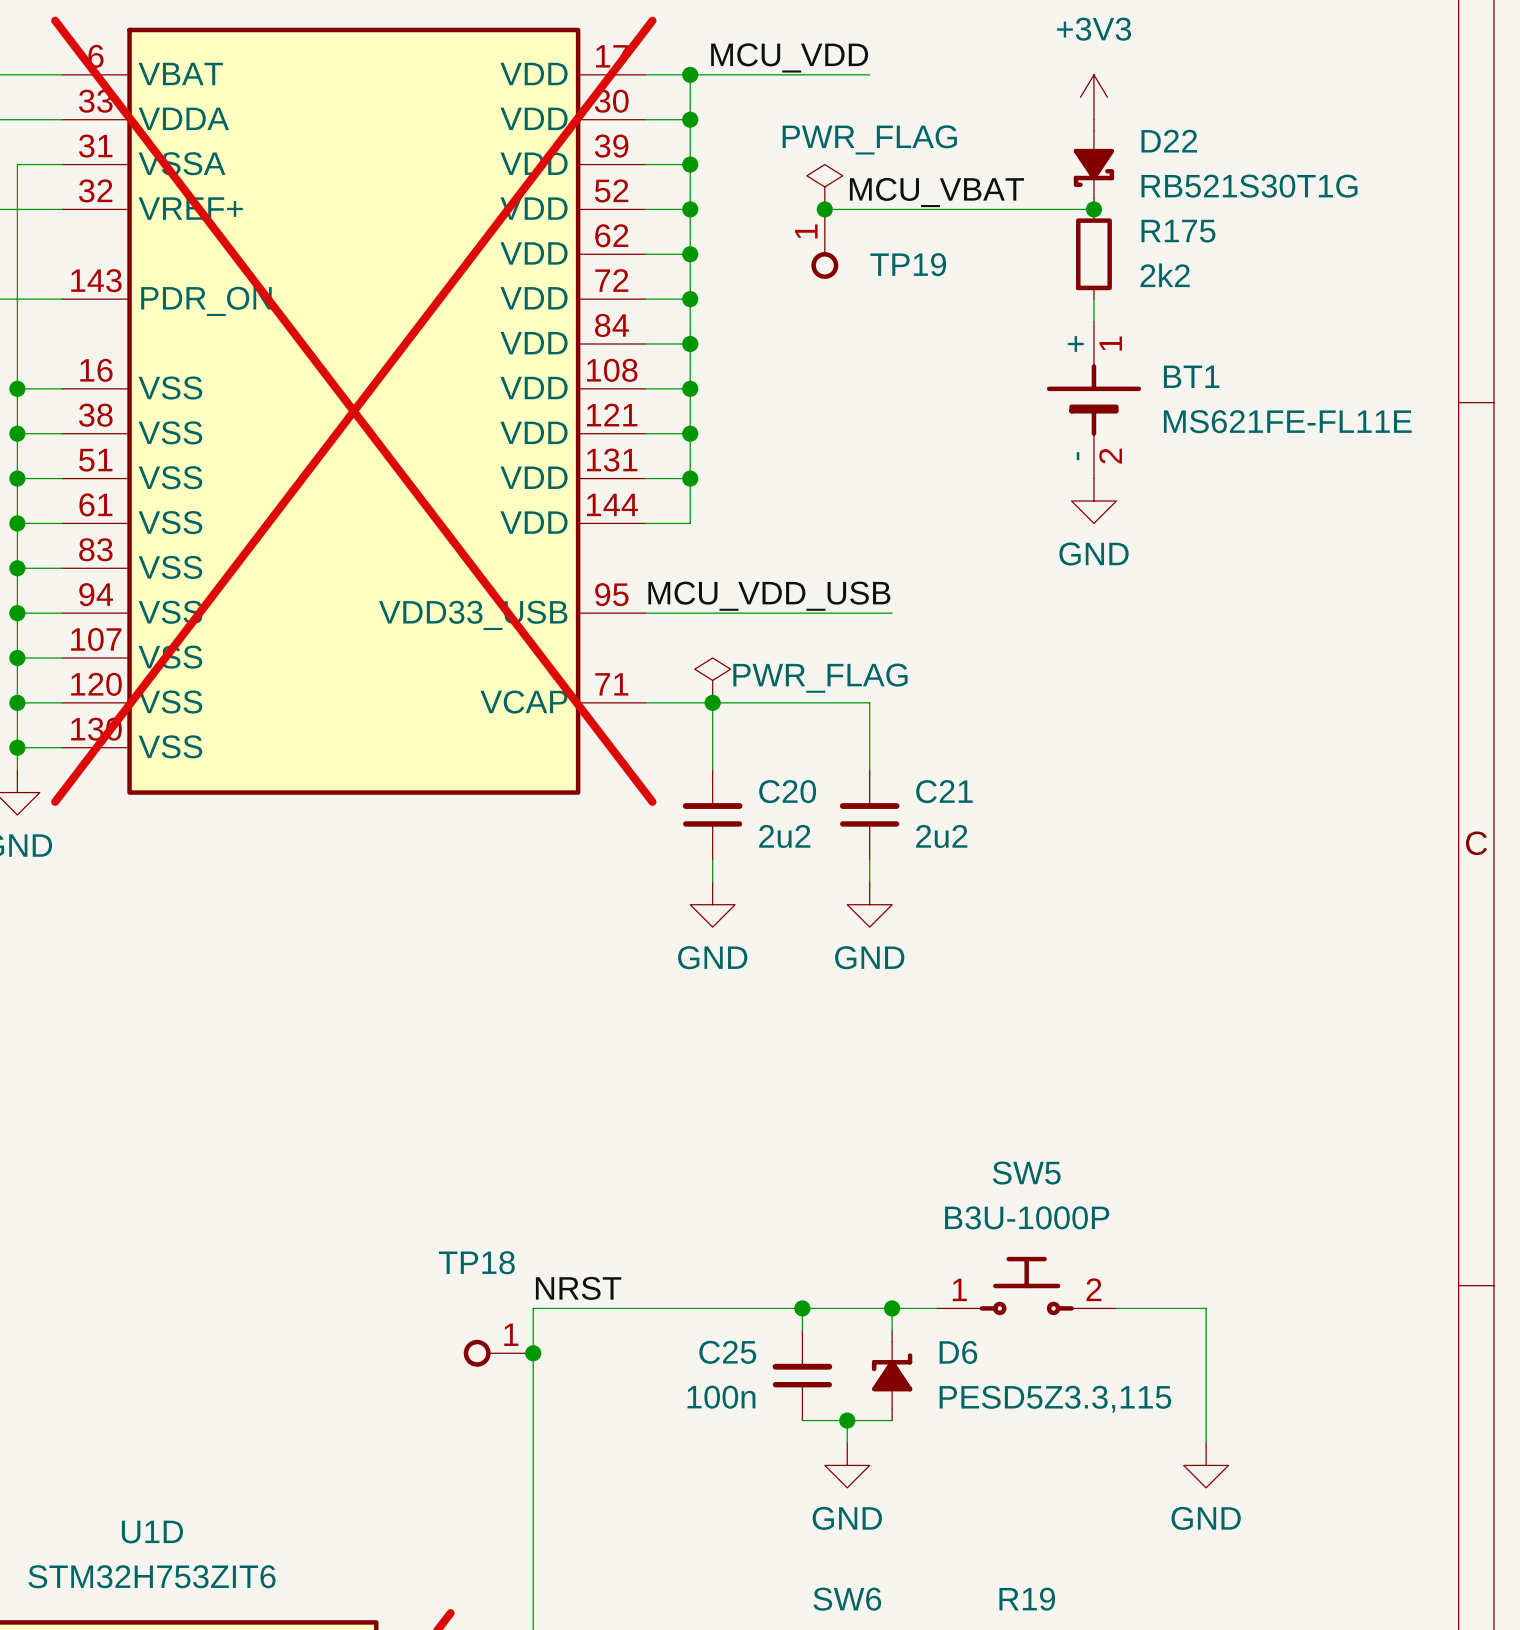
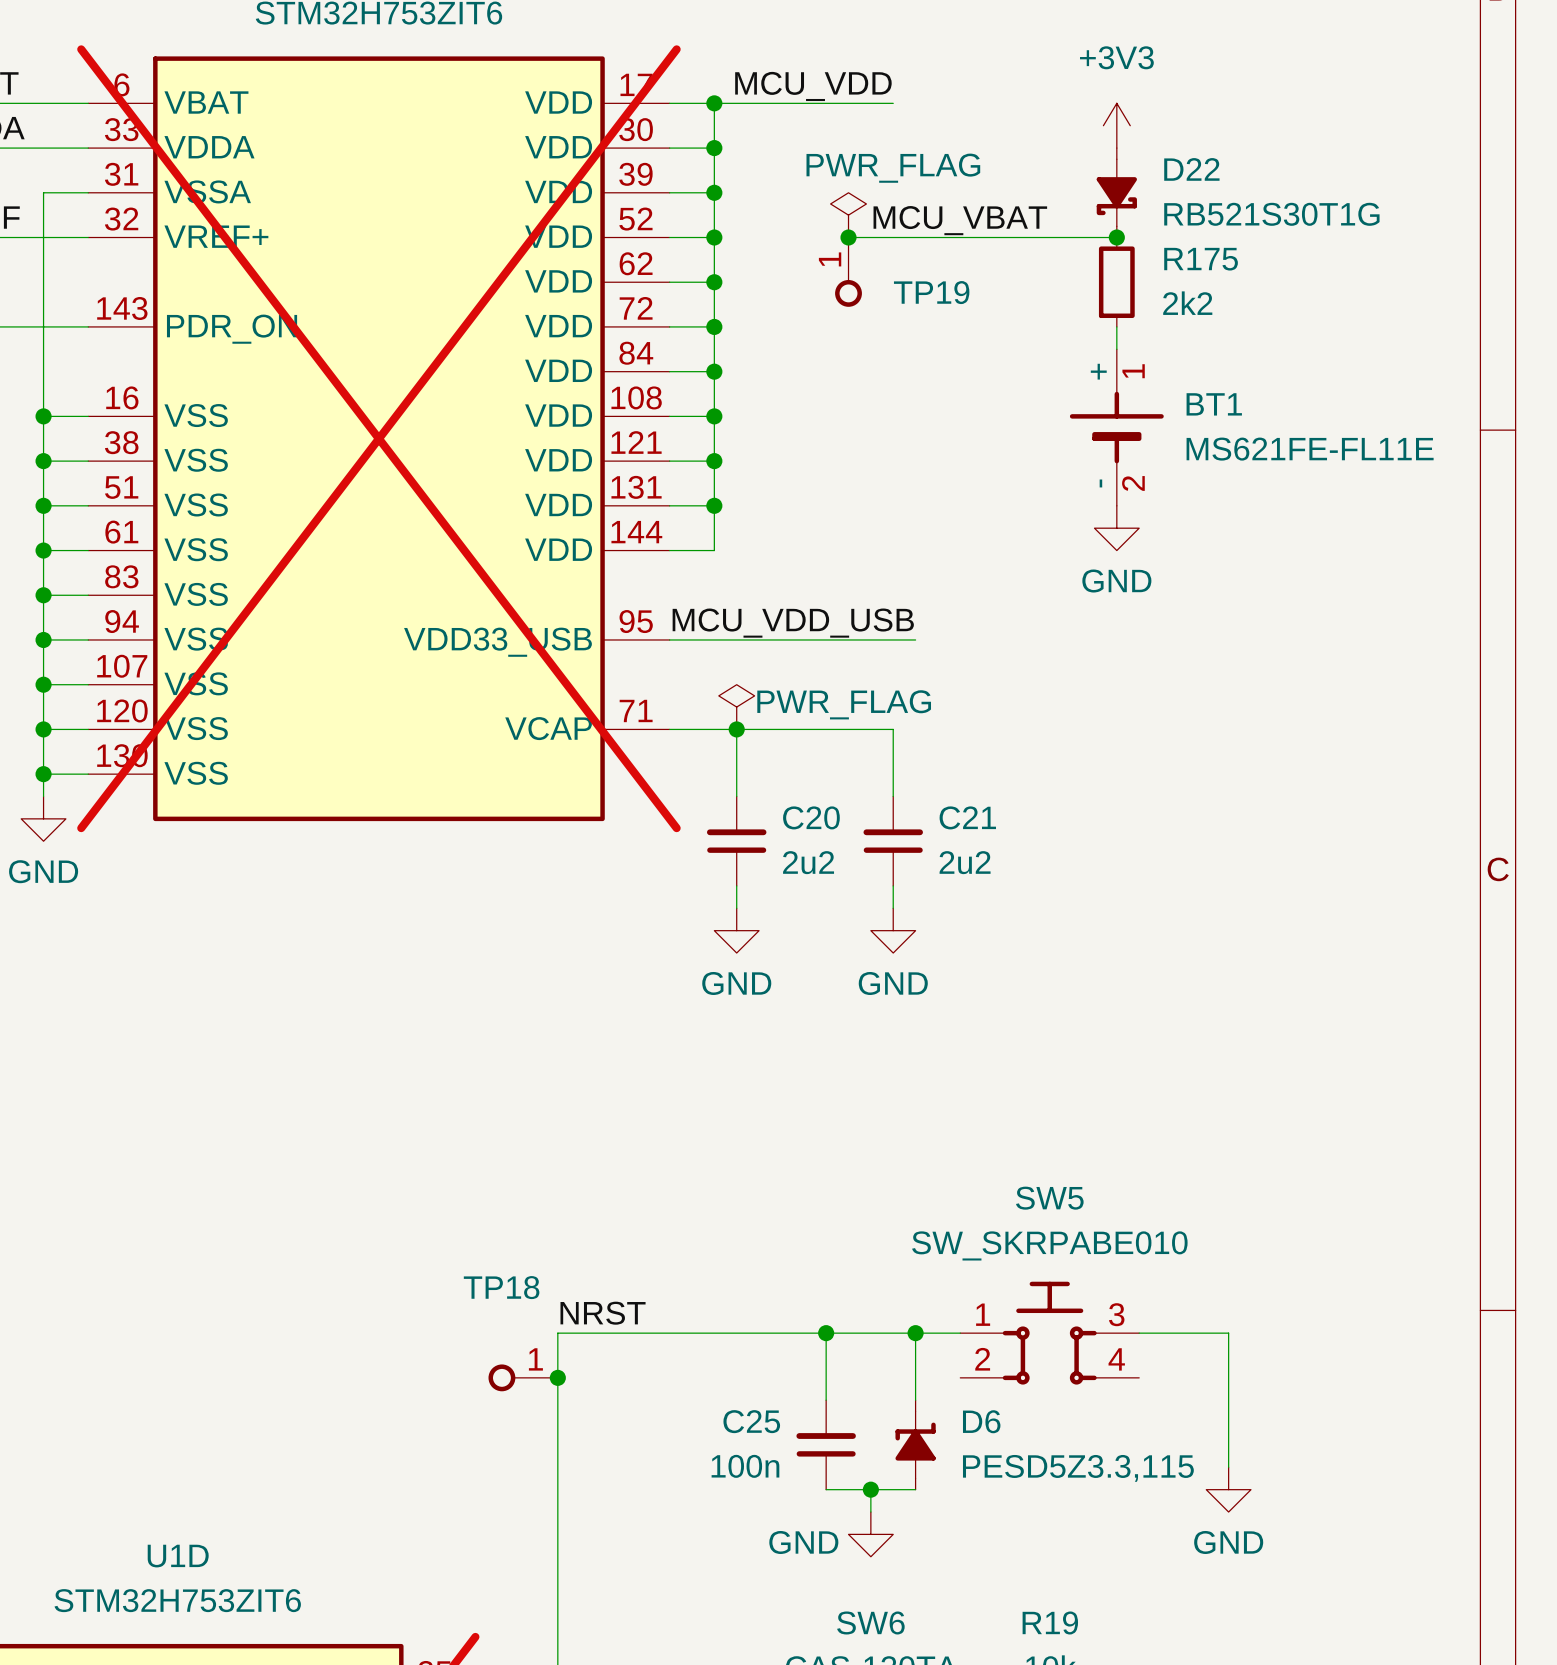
SW5 text: B3U-1000P (1027, 1217) -> none
SW5 value: none -> SW_SKRPABE010 (1049, 1245)
SW5 symbol: [936, 1256, 1117, 1316] -> [960, 1281, 1140, 1385]
C25 position: (802, 1375) -> (826, 1444)
D6 position: (892, 1375) -> (915, 1444)
wire: (802, 1420) (892, 1420) -> (826, 1489) (915, 1489)
wire: (847, 1420) (847, 1443) -> (870, 1489) (870, 1512)
junction position: (847, 1420) -> (870, 1489)
power symbol position: GND (847, 1465) -> GND (870, 1534)
power symbol text position: GND (847, 1518) -> GND (803, 1542)

